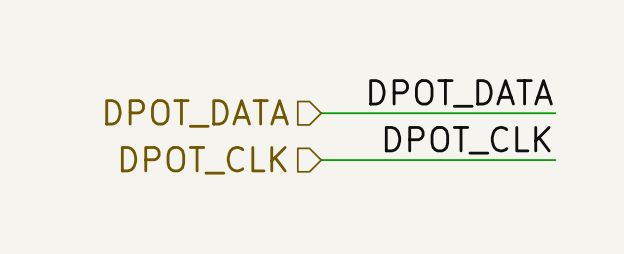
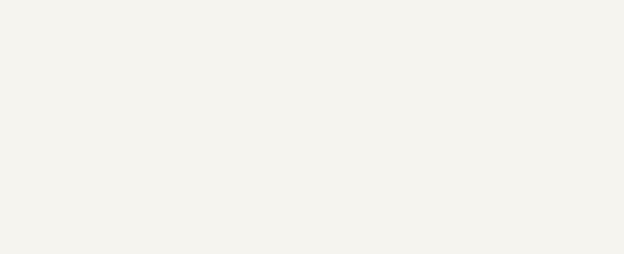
label: DPOT_DATA (461, 93) -> none
hierarchical label: DPOT_DATA (197, 113) -> none
wire: (321, 113) (555, 113) -> none
label: DPOT_CLK (467, 140) -> none
hierarchical label: DPOT_CLK (203, 160) -> none
wire: (321, 160) (555, 160) -> none

